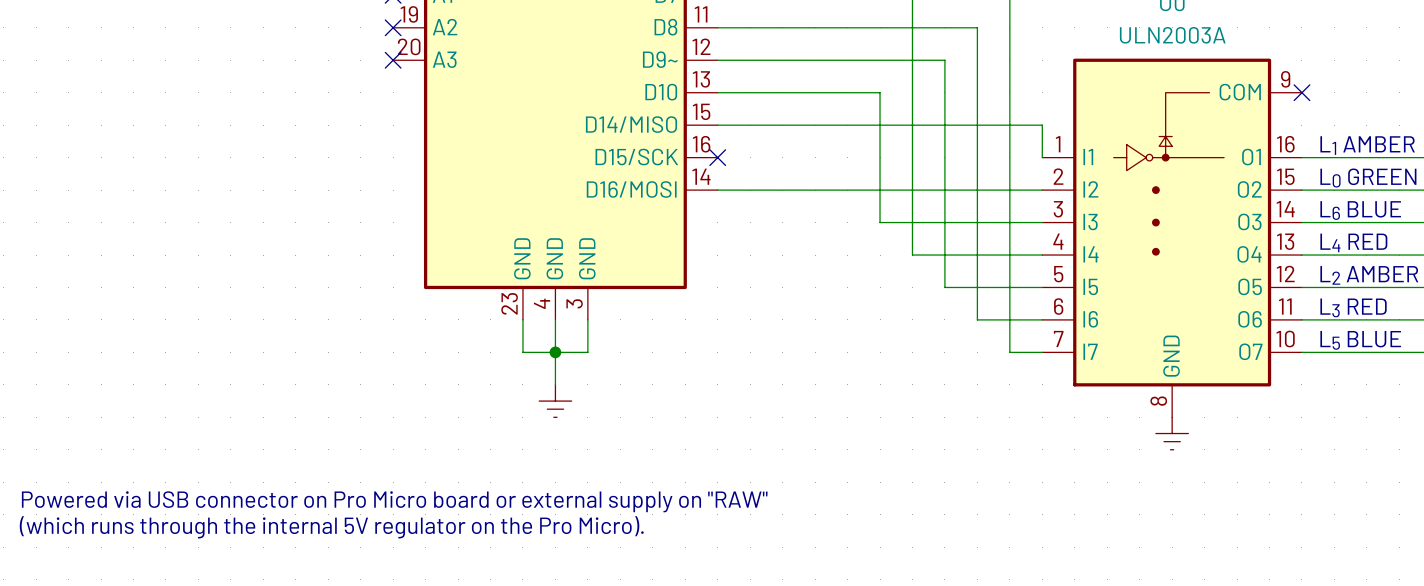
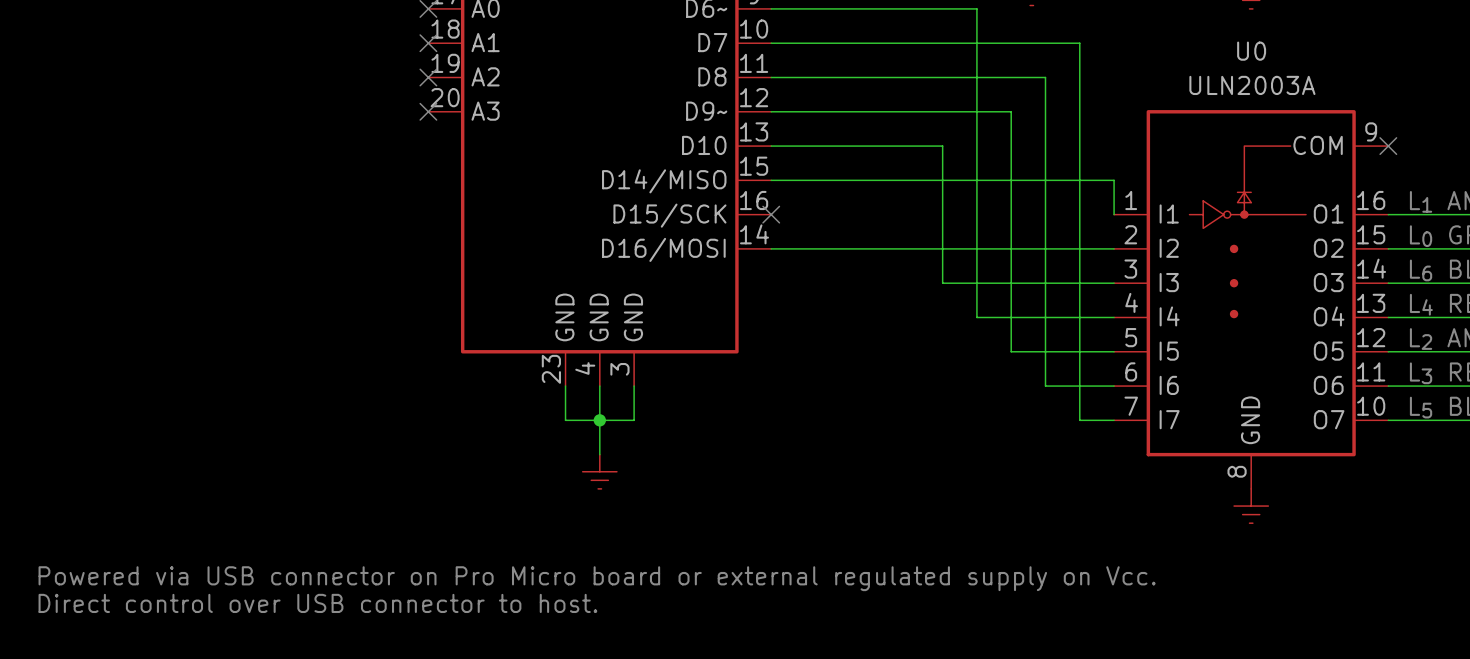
text: Powered via USB connector on Pro Micro board or external supply on "RAW" (394, 501) -> Powered via USB connector on Pro Micro board or external regulated supply on Vcc. (597, 578)
text: (which runs through the internal 5V regulator on the Pro Micro). (331, 527) -> Direct control over USB connector to host. (317, 603)

